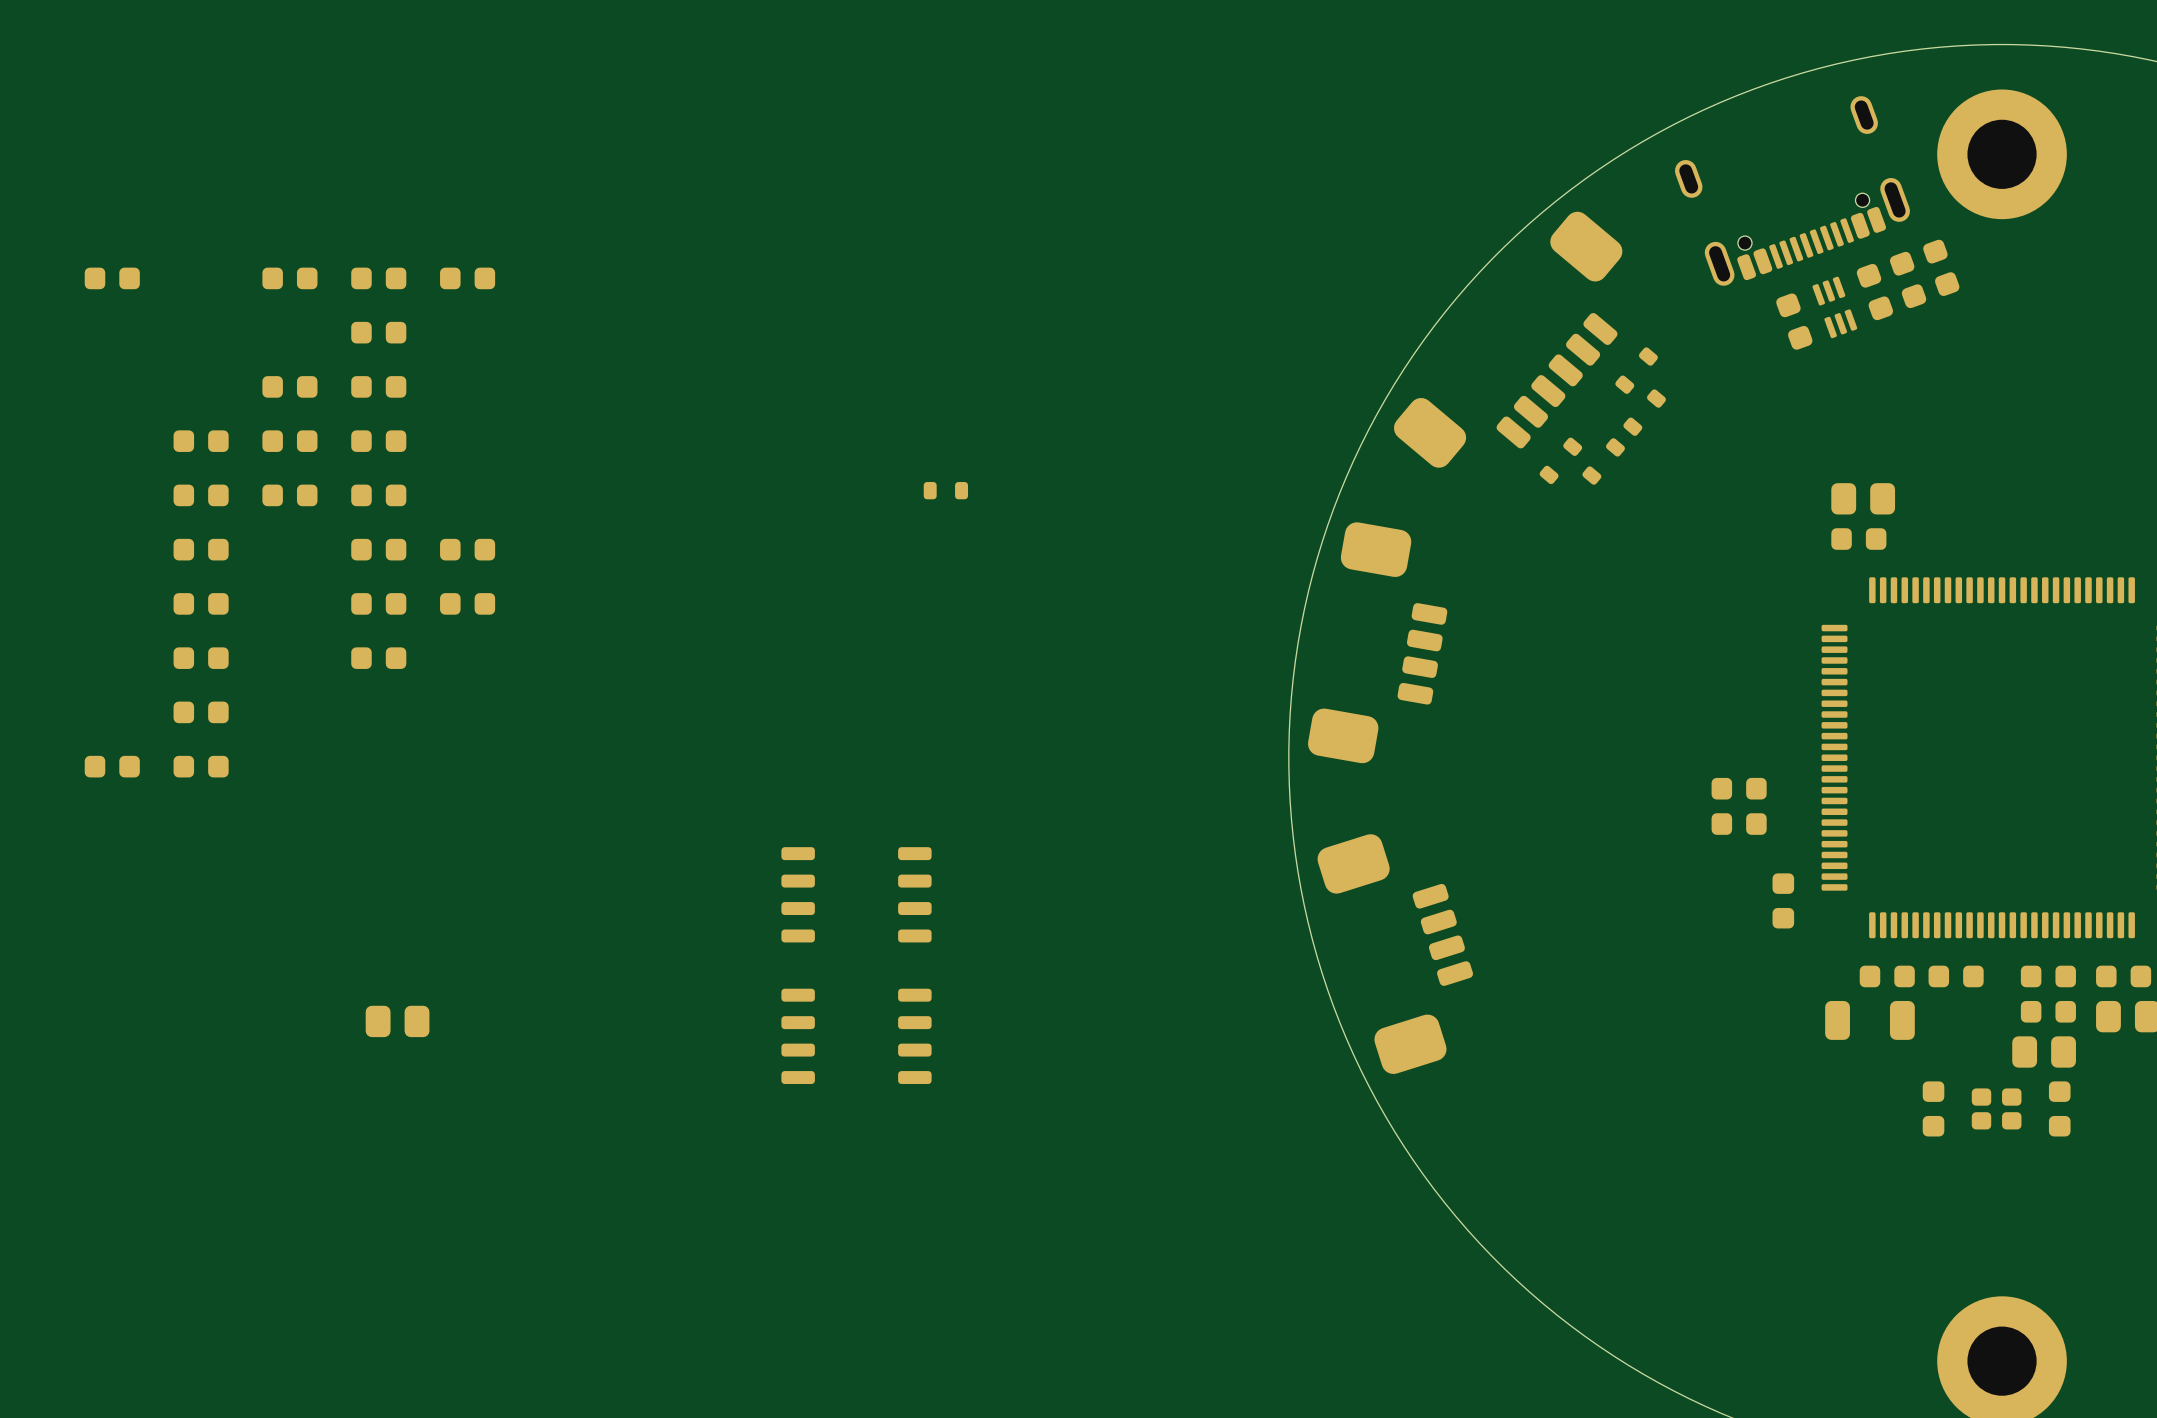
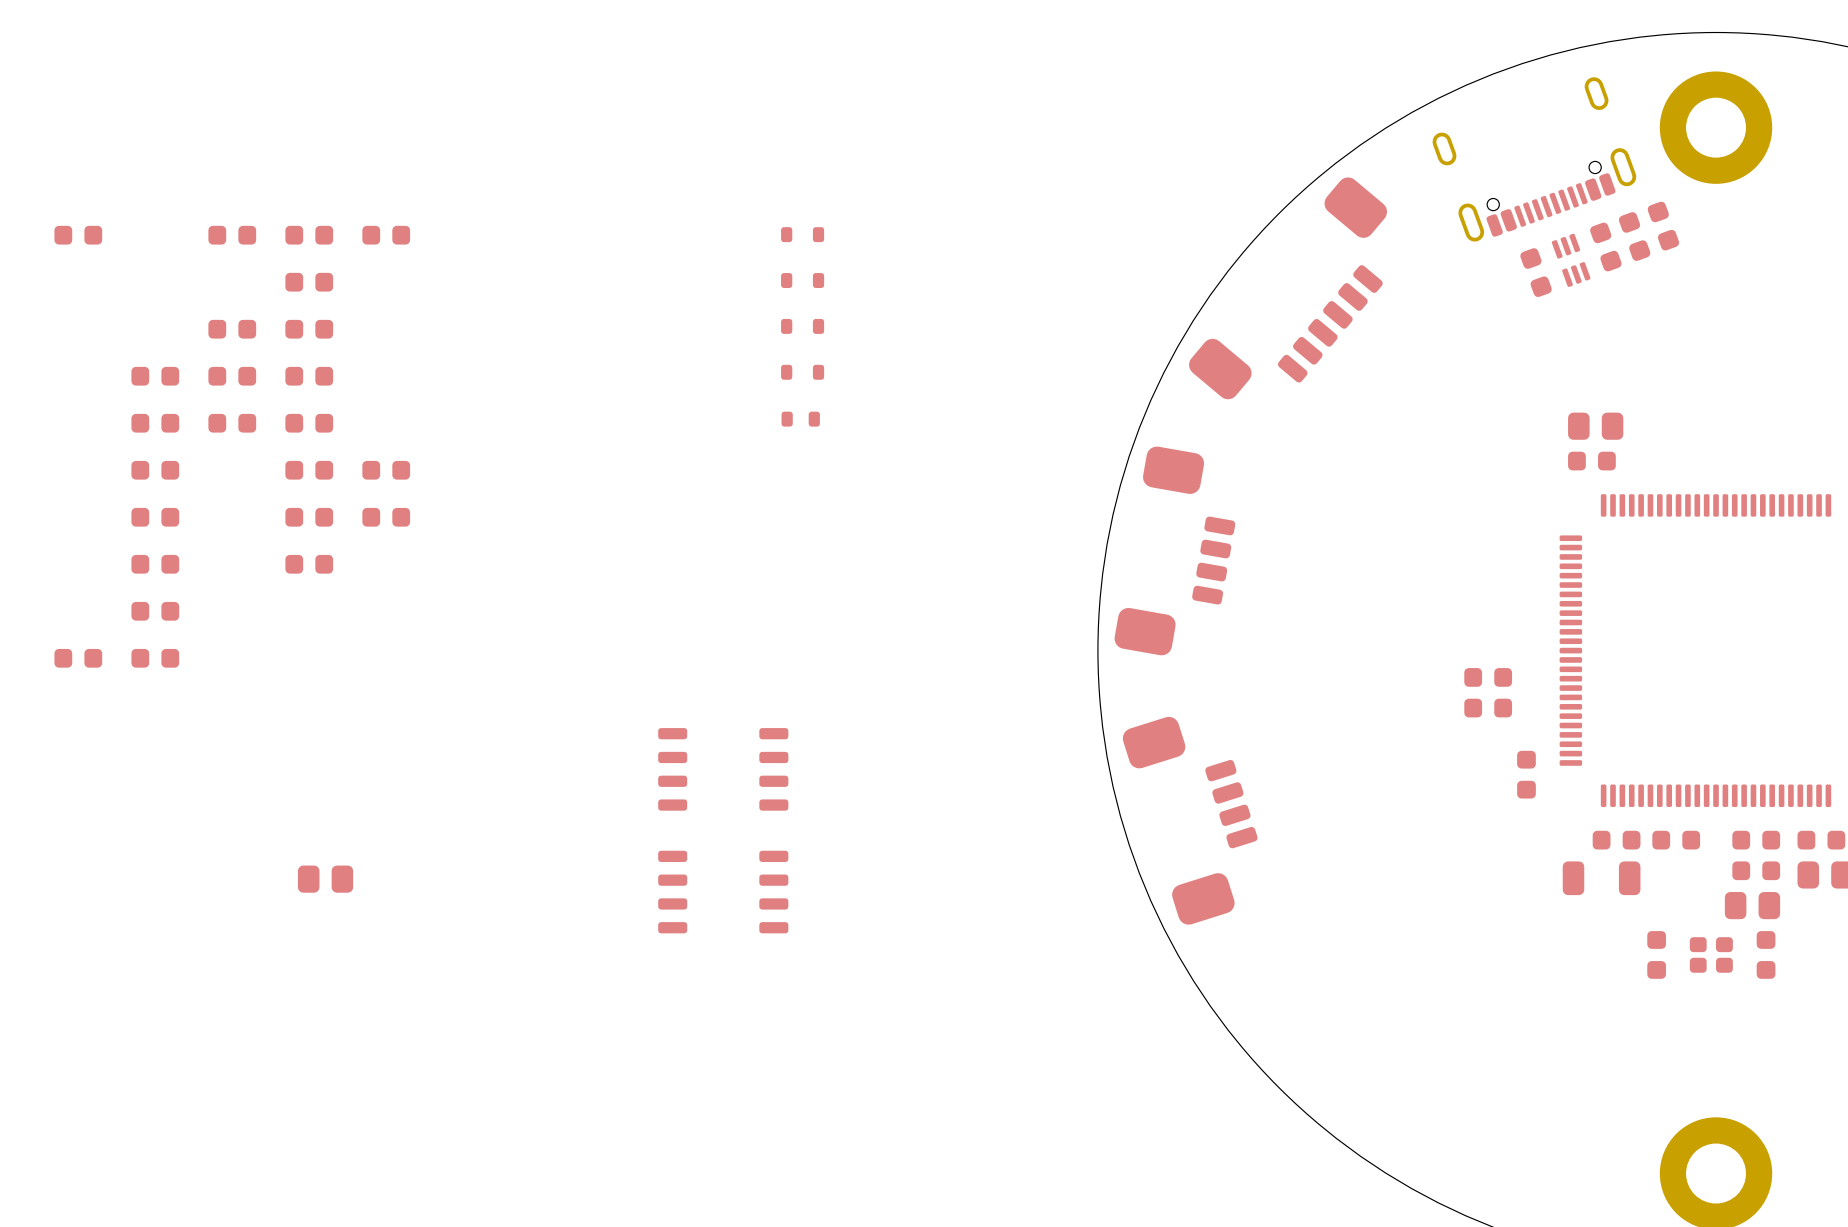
part: none -> (802, 234)
part: none -> (802, 280)
part: (1636, 370) -> none
part: none -> (802, 326)
part: (1644, 412) -> none
part: none -> (802, 372)
part: (1560, 460) -> none
part: (1603, 461) -> none

